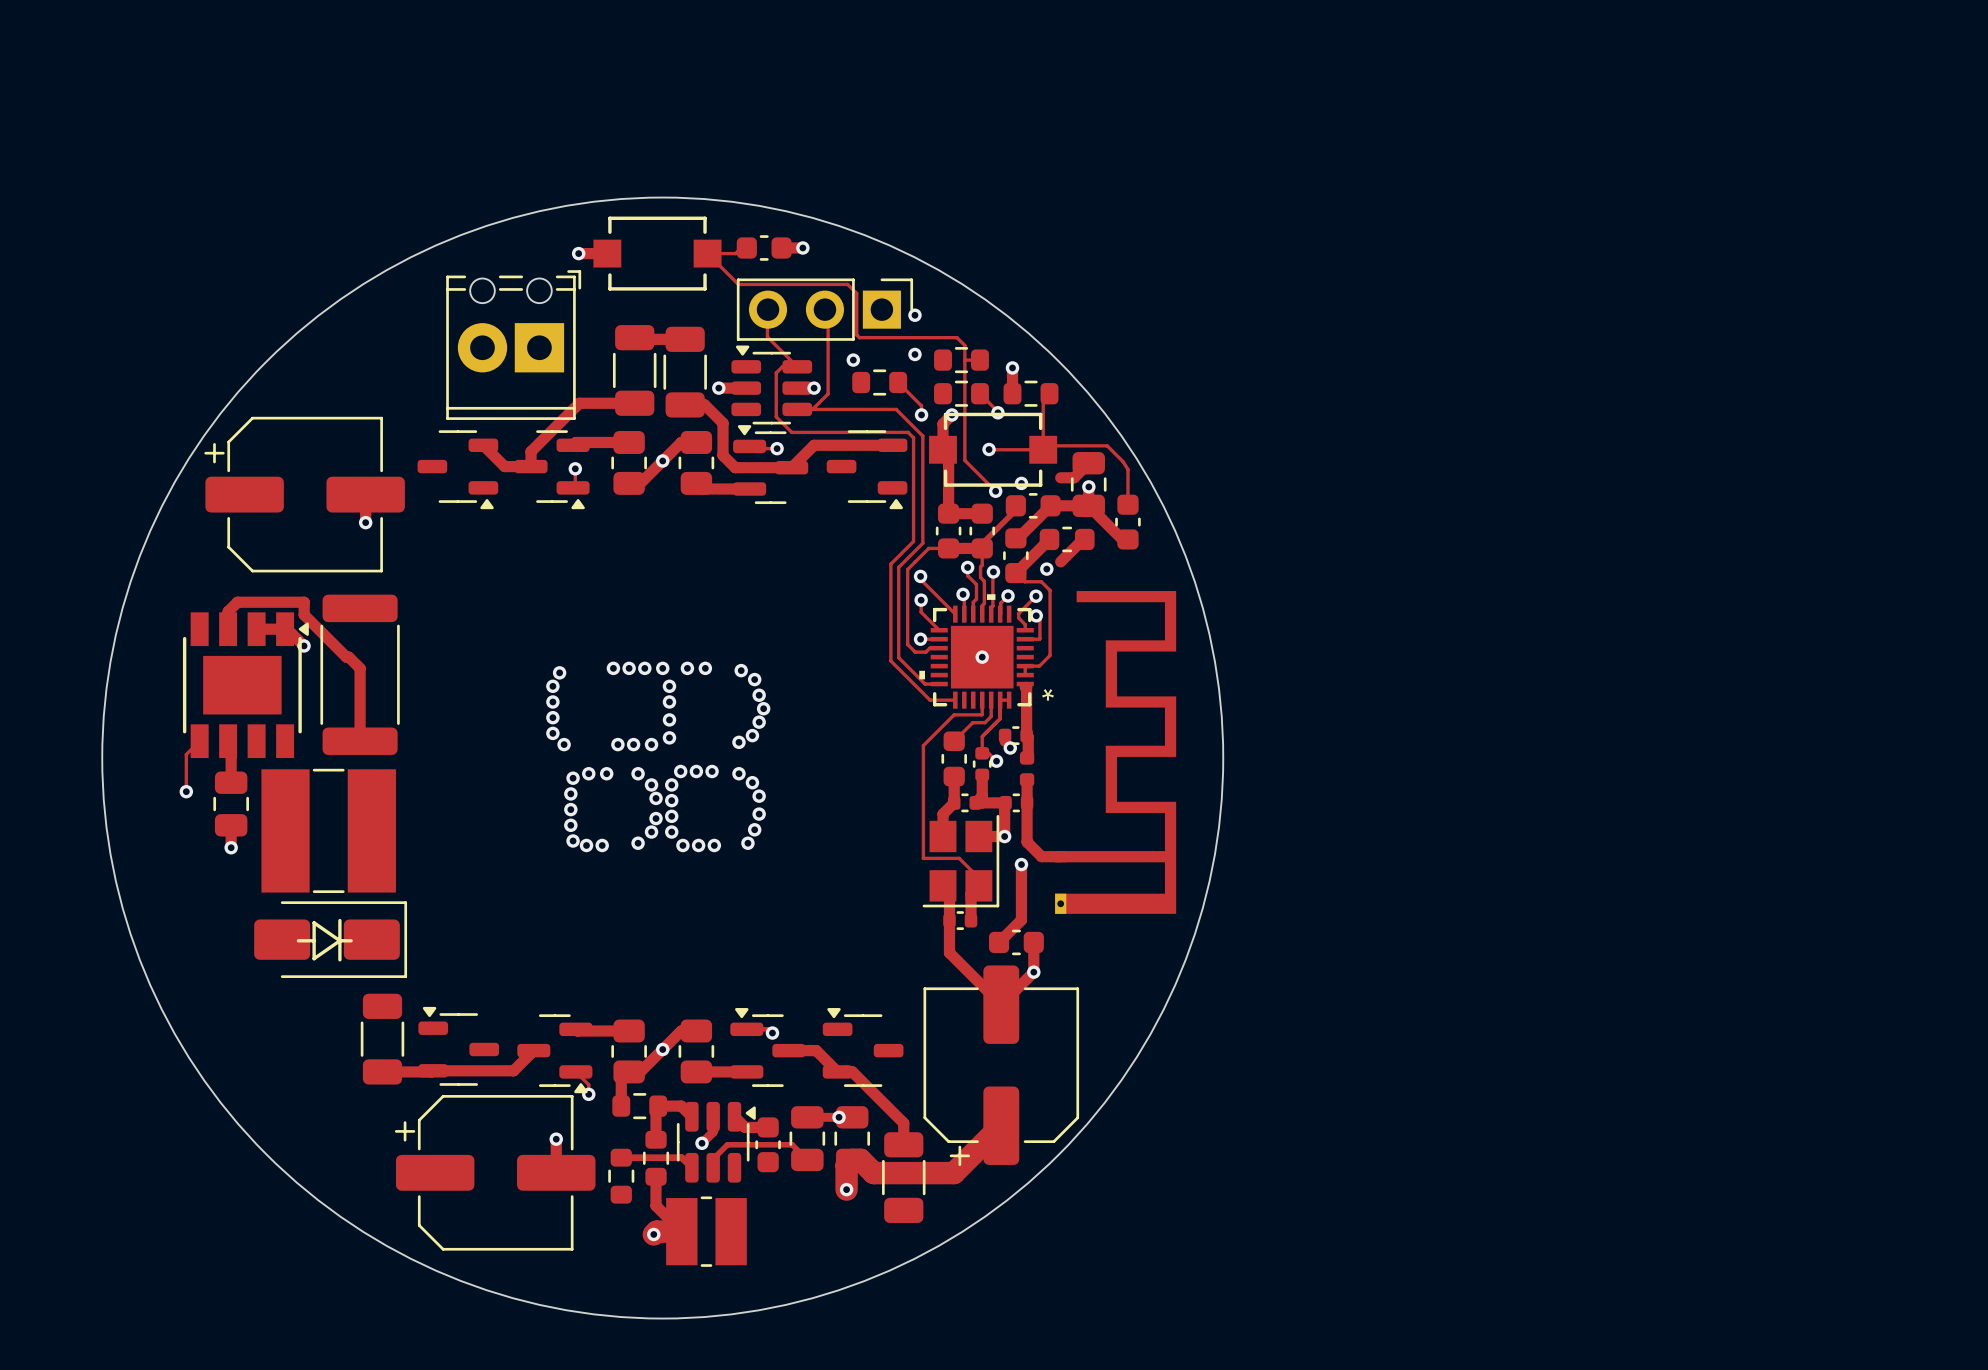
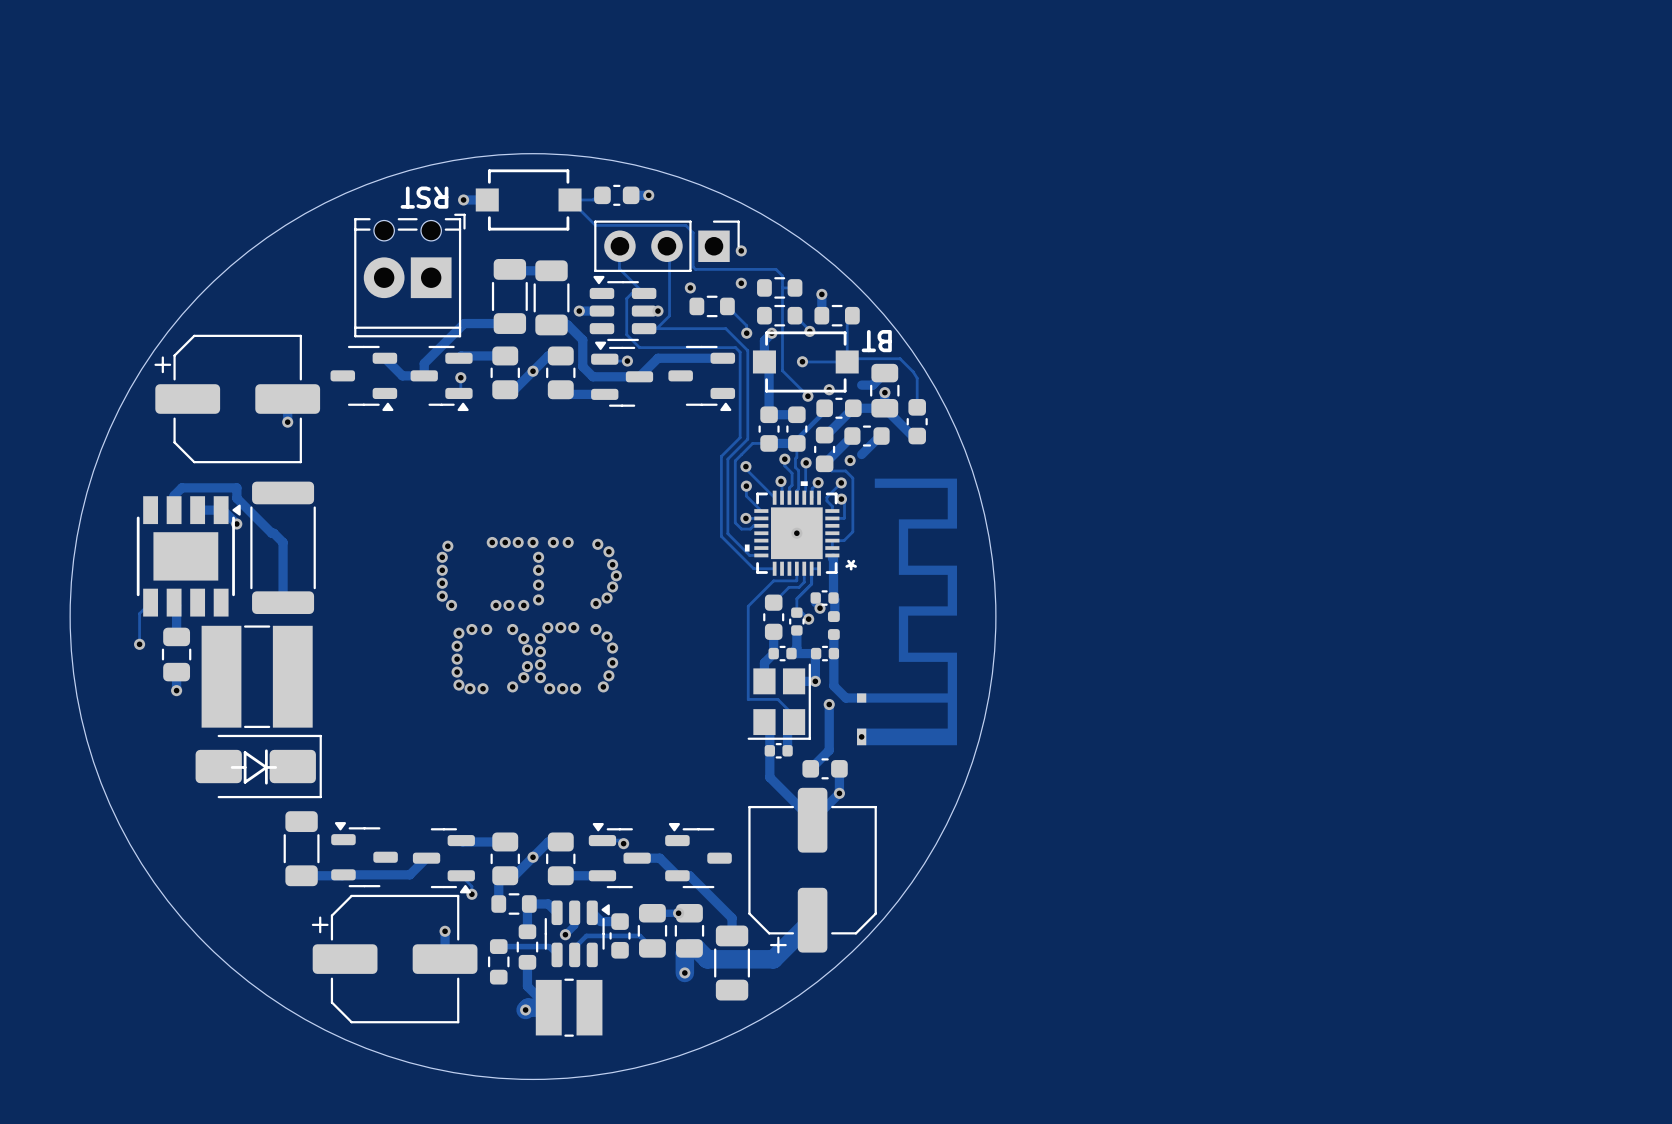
text: none -> RST (424, 197)
text: none -> BT (876, 341)

